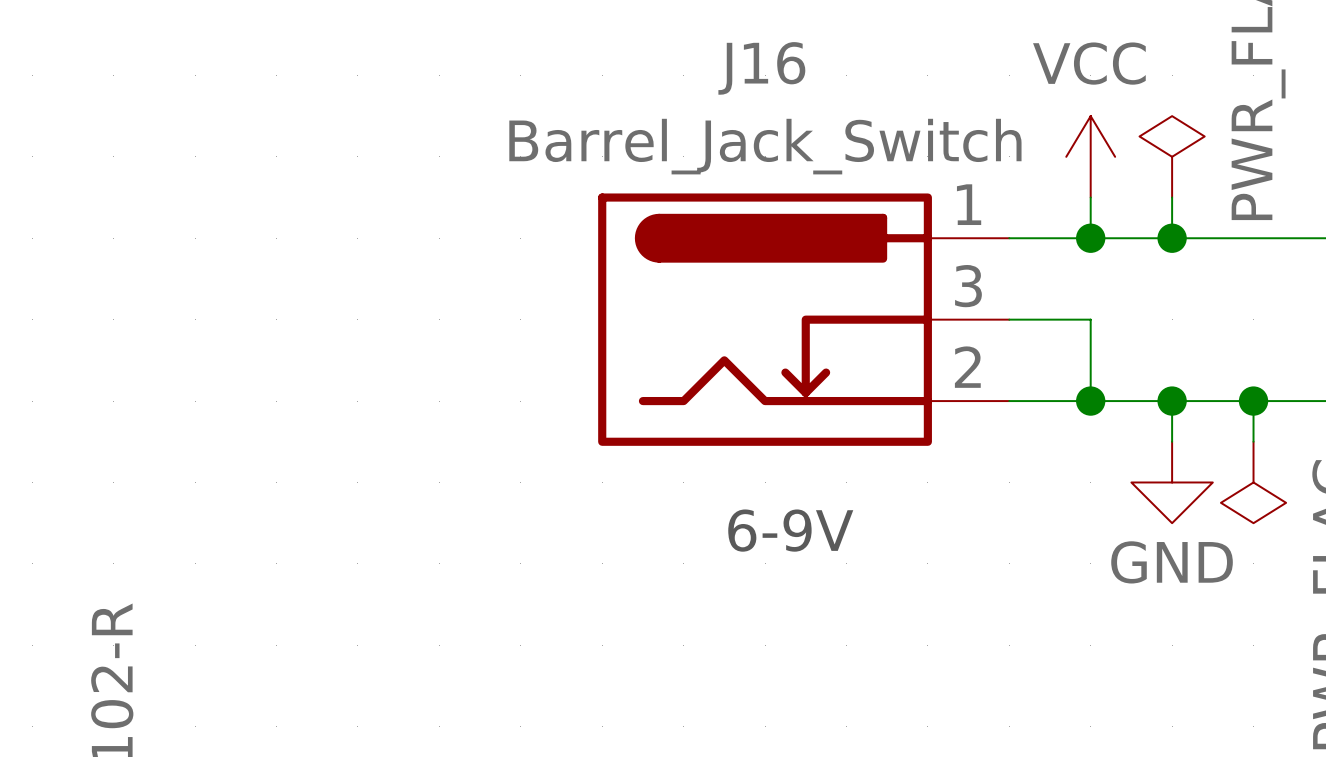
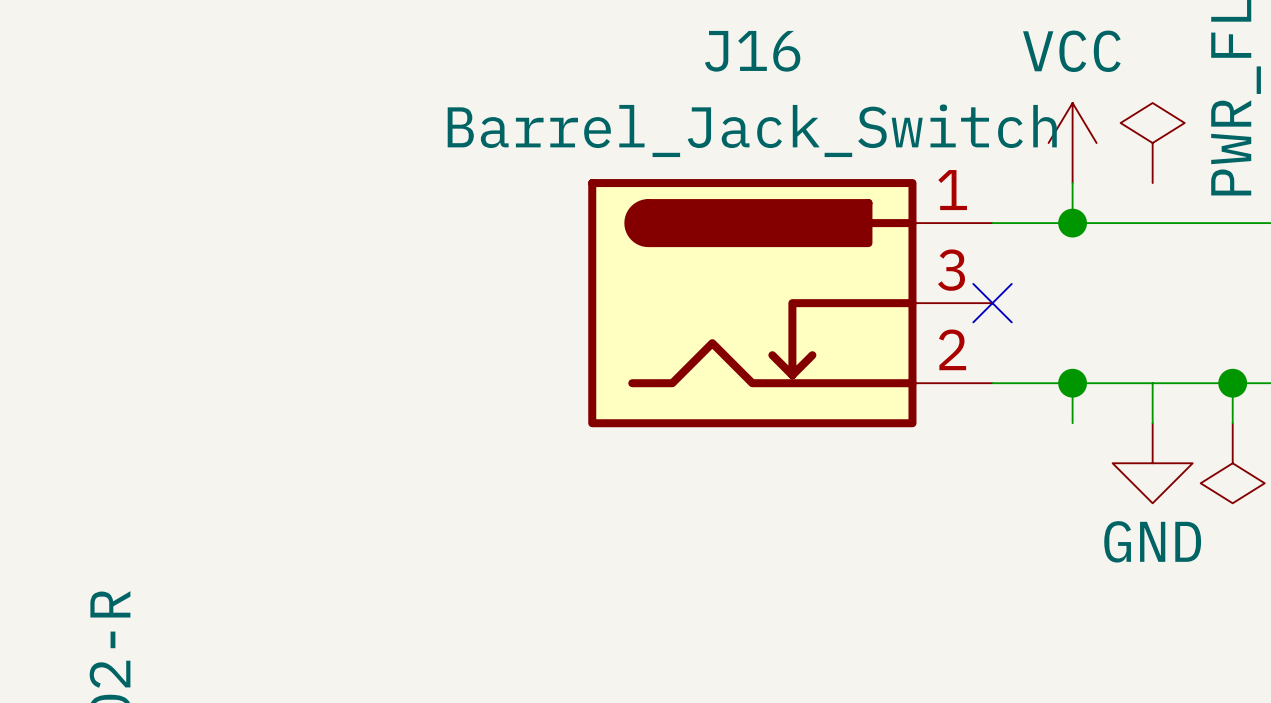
wire: (1172, 197) (1172, 238) -> none
junction: (1172, 238) -> none
wire: (1009, 319) (1090, 319) (1090, 401) -> (1072, 423) (1072, 383)
no-connect mark: none -> (992, 303)
junction: (1172, 401) -> none
text: 6-9V (790, 530) -> none

